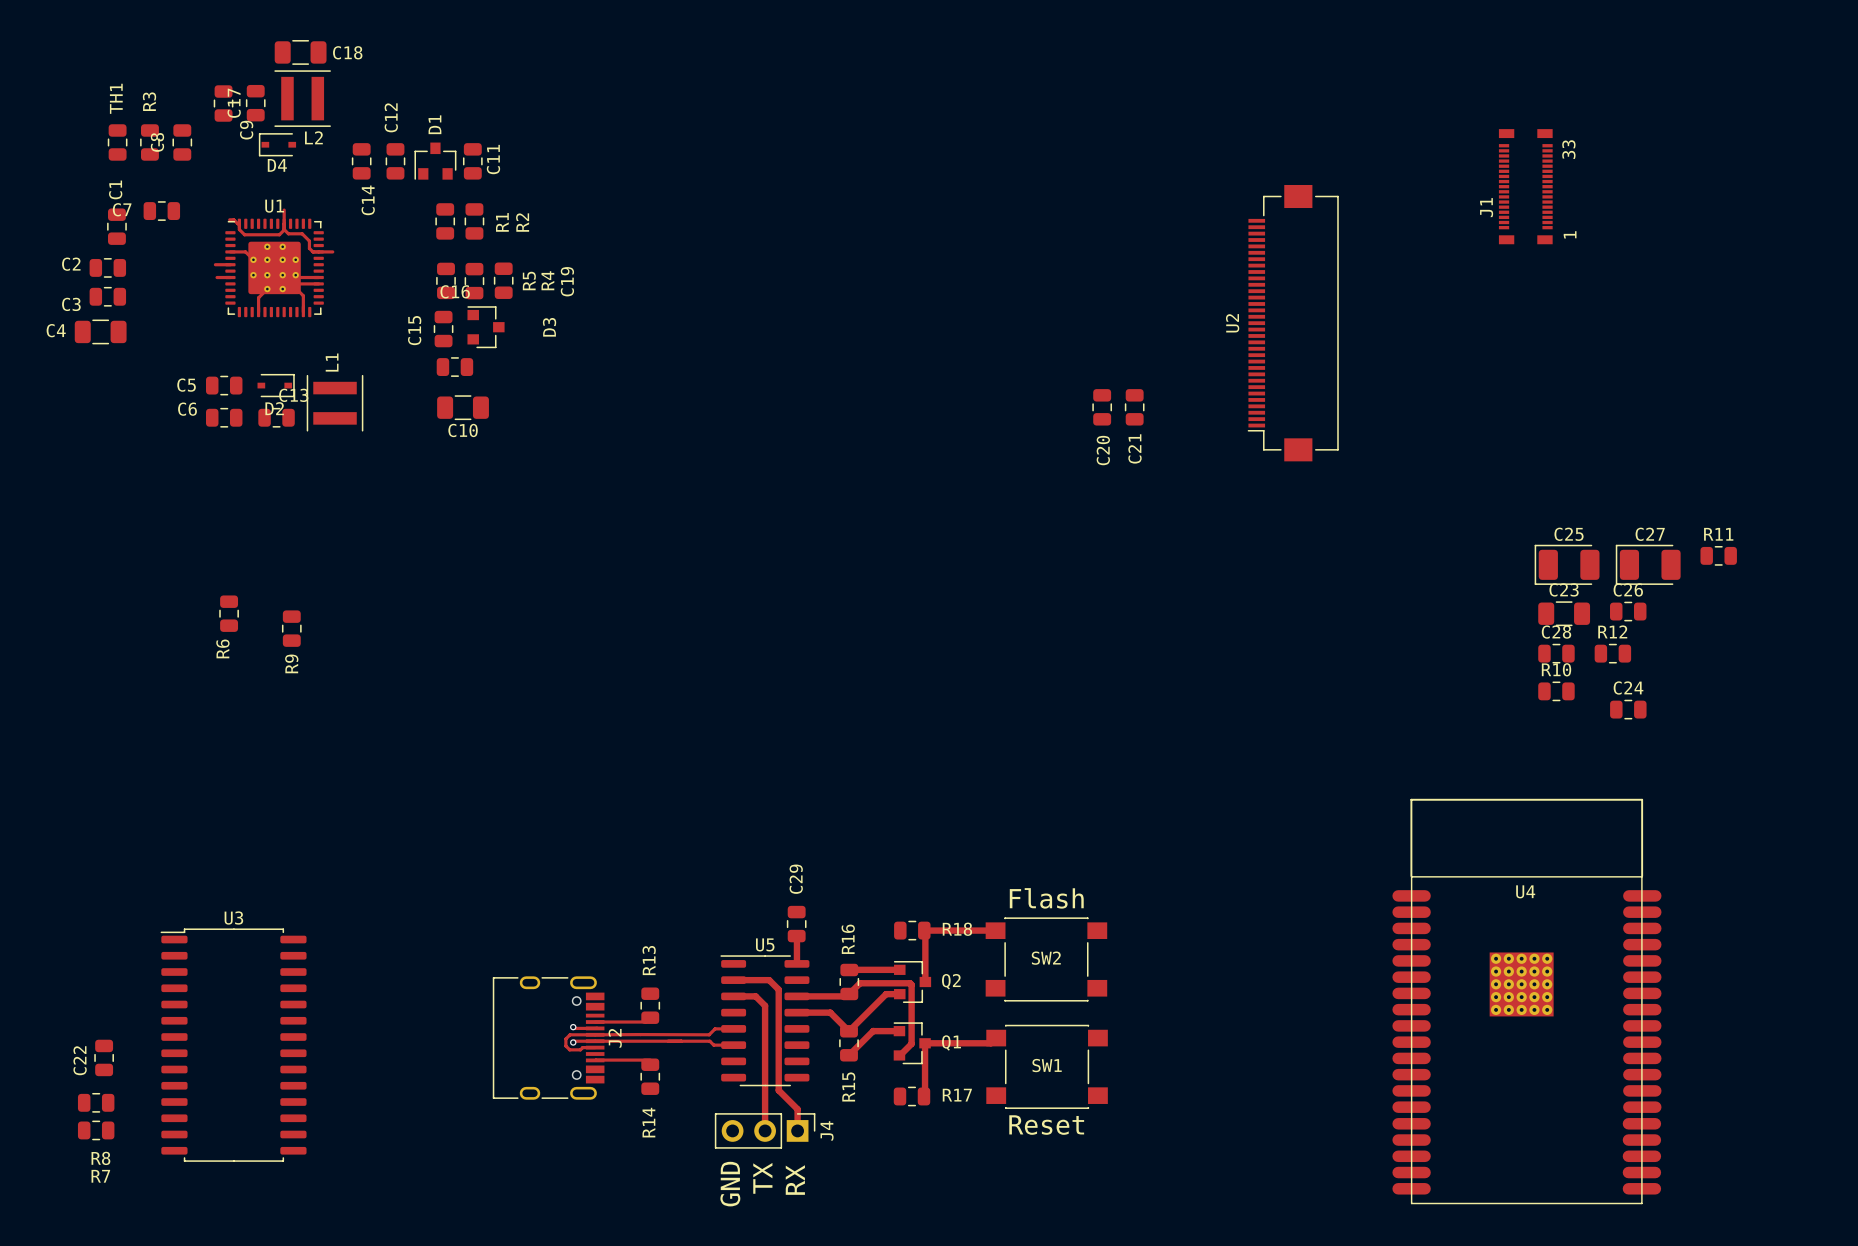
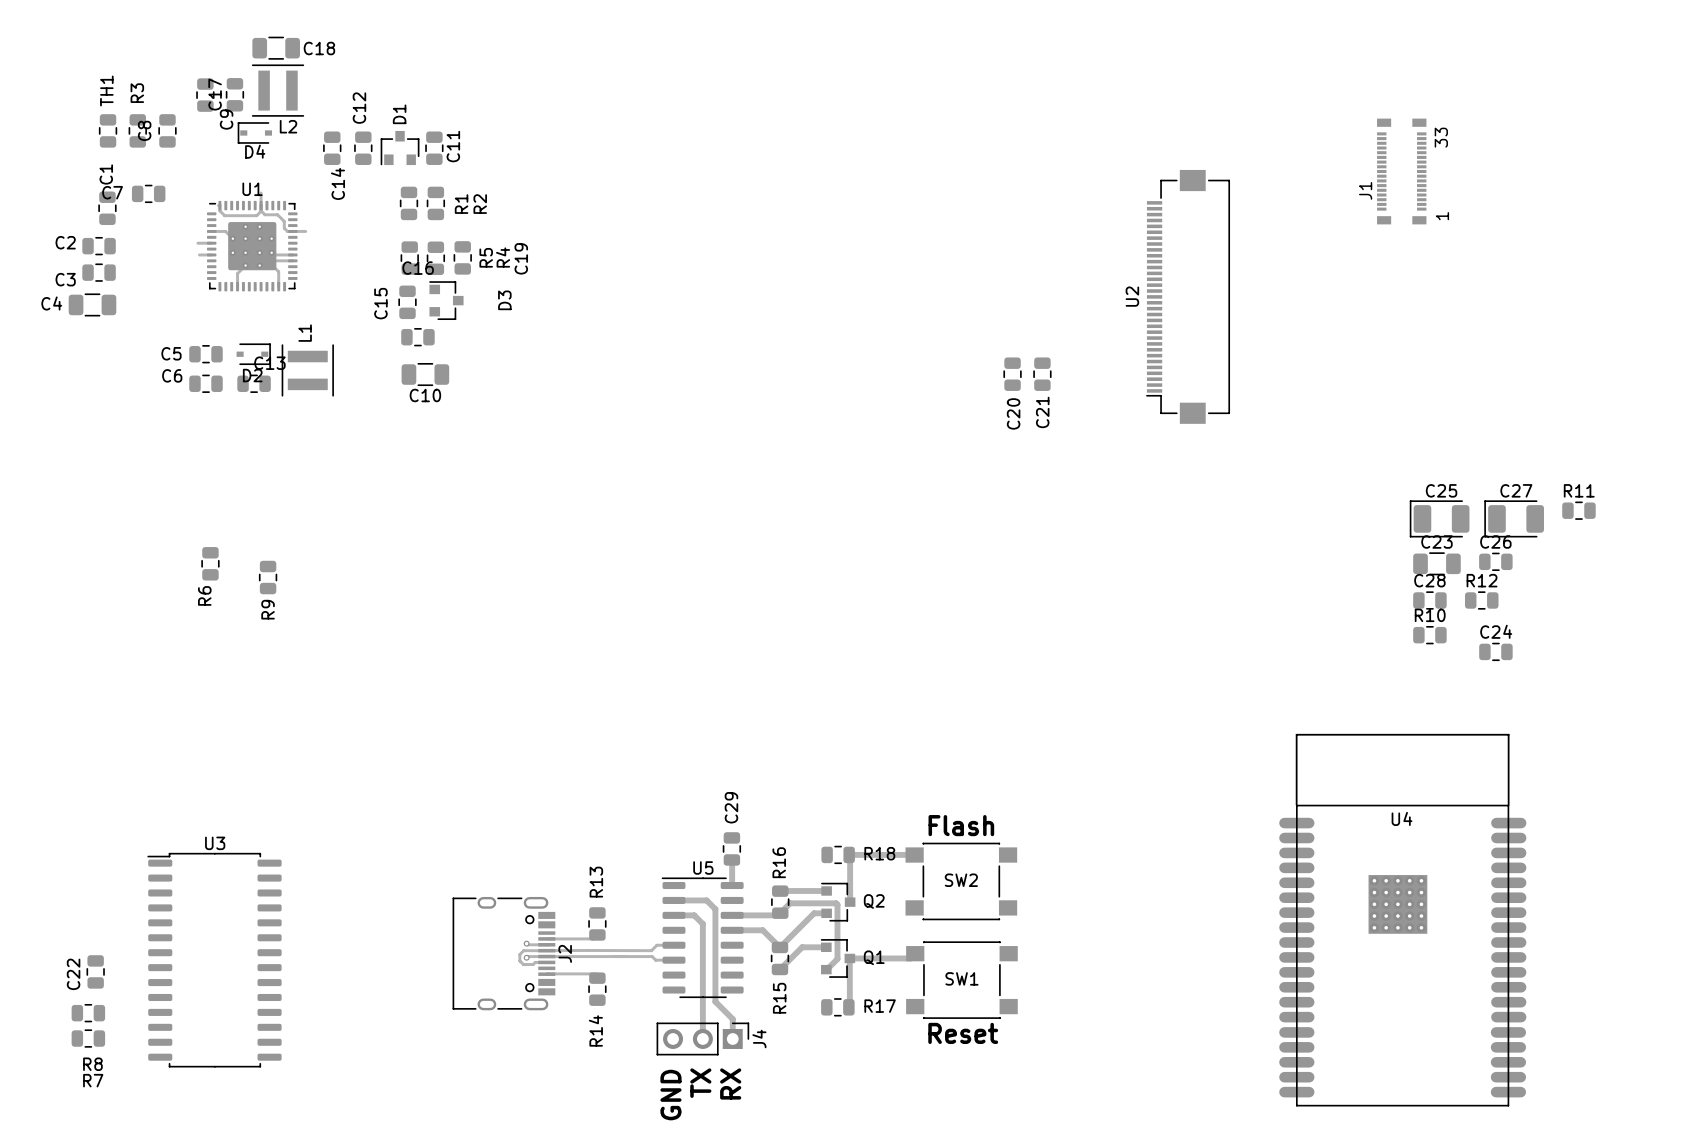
track: (229, 219) (233, 219) (237, 223) -> none

